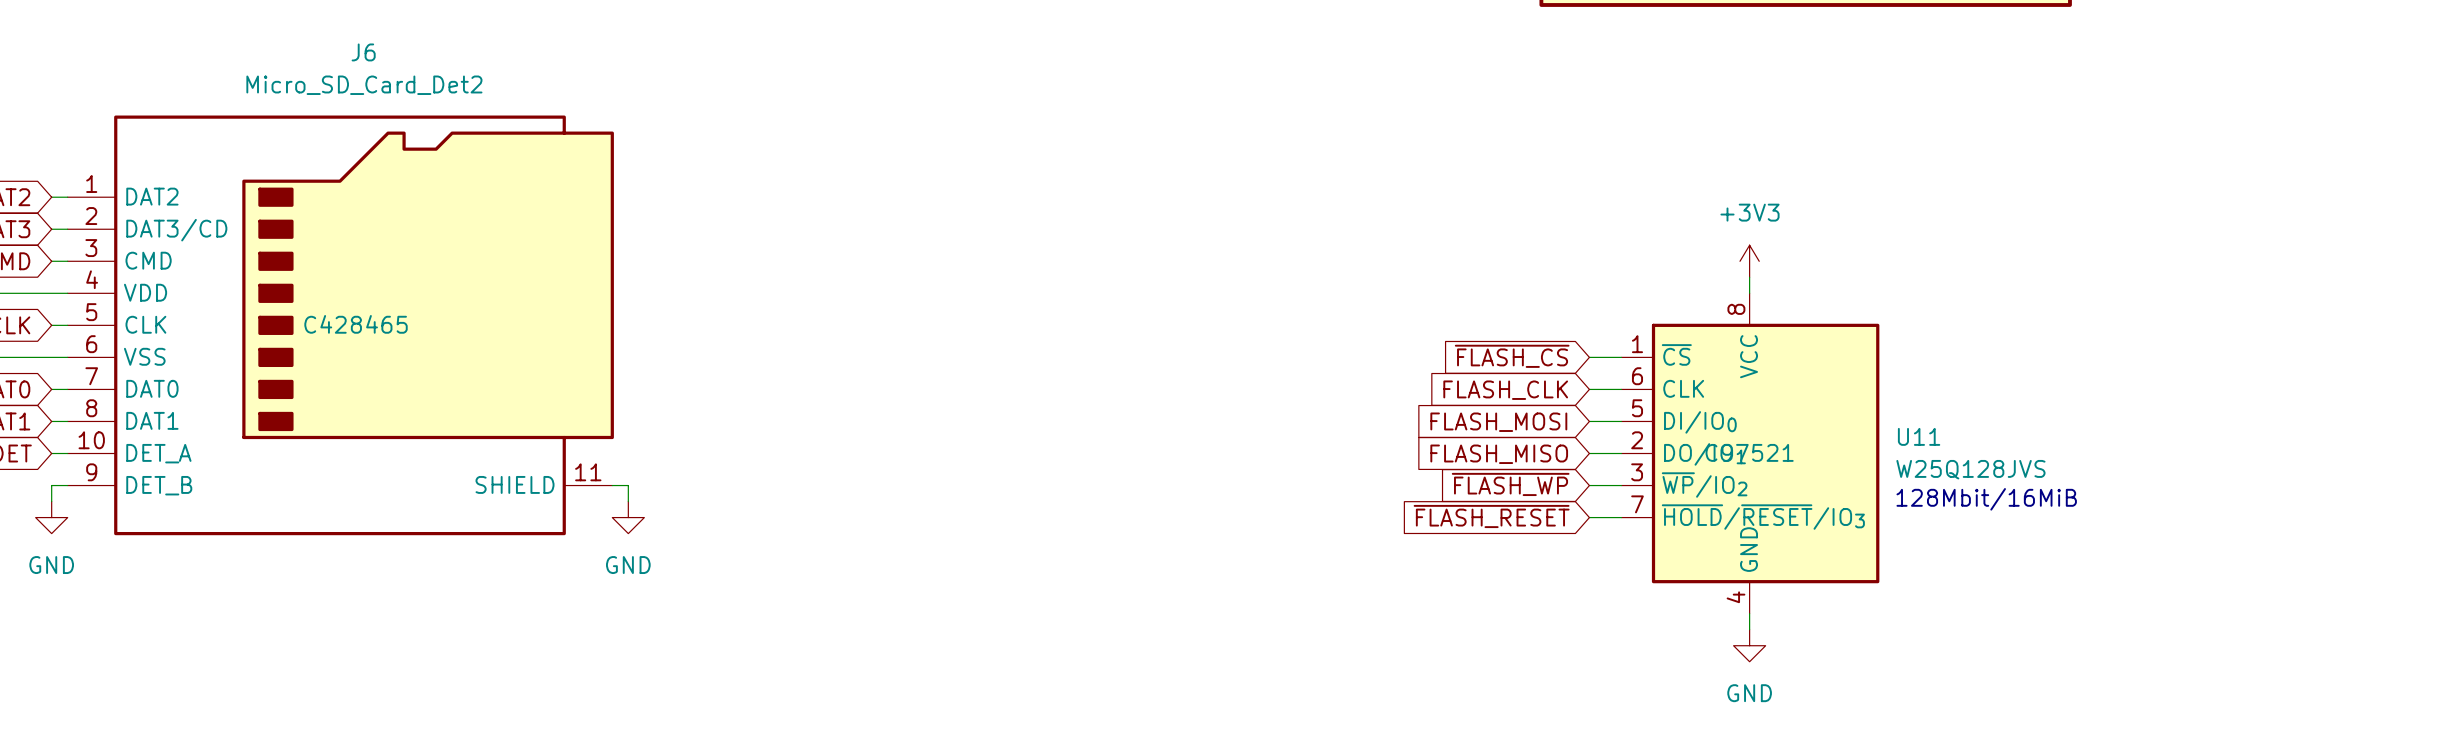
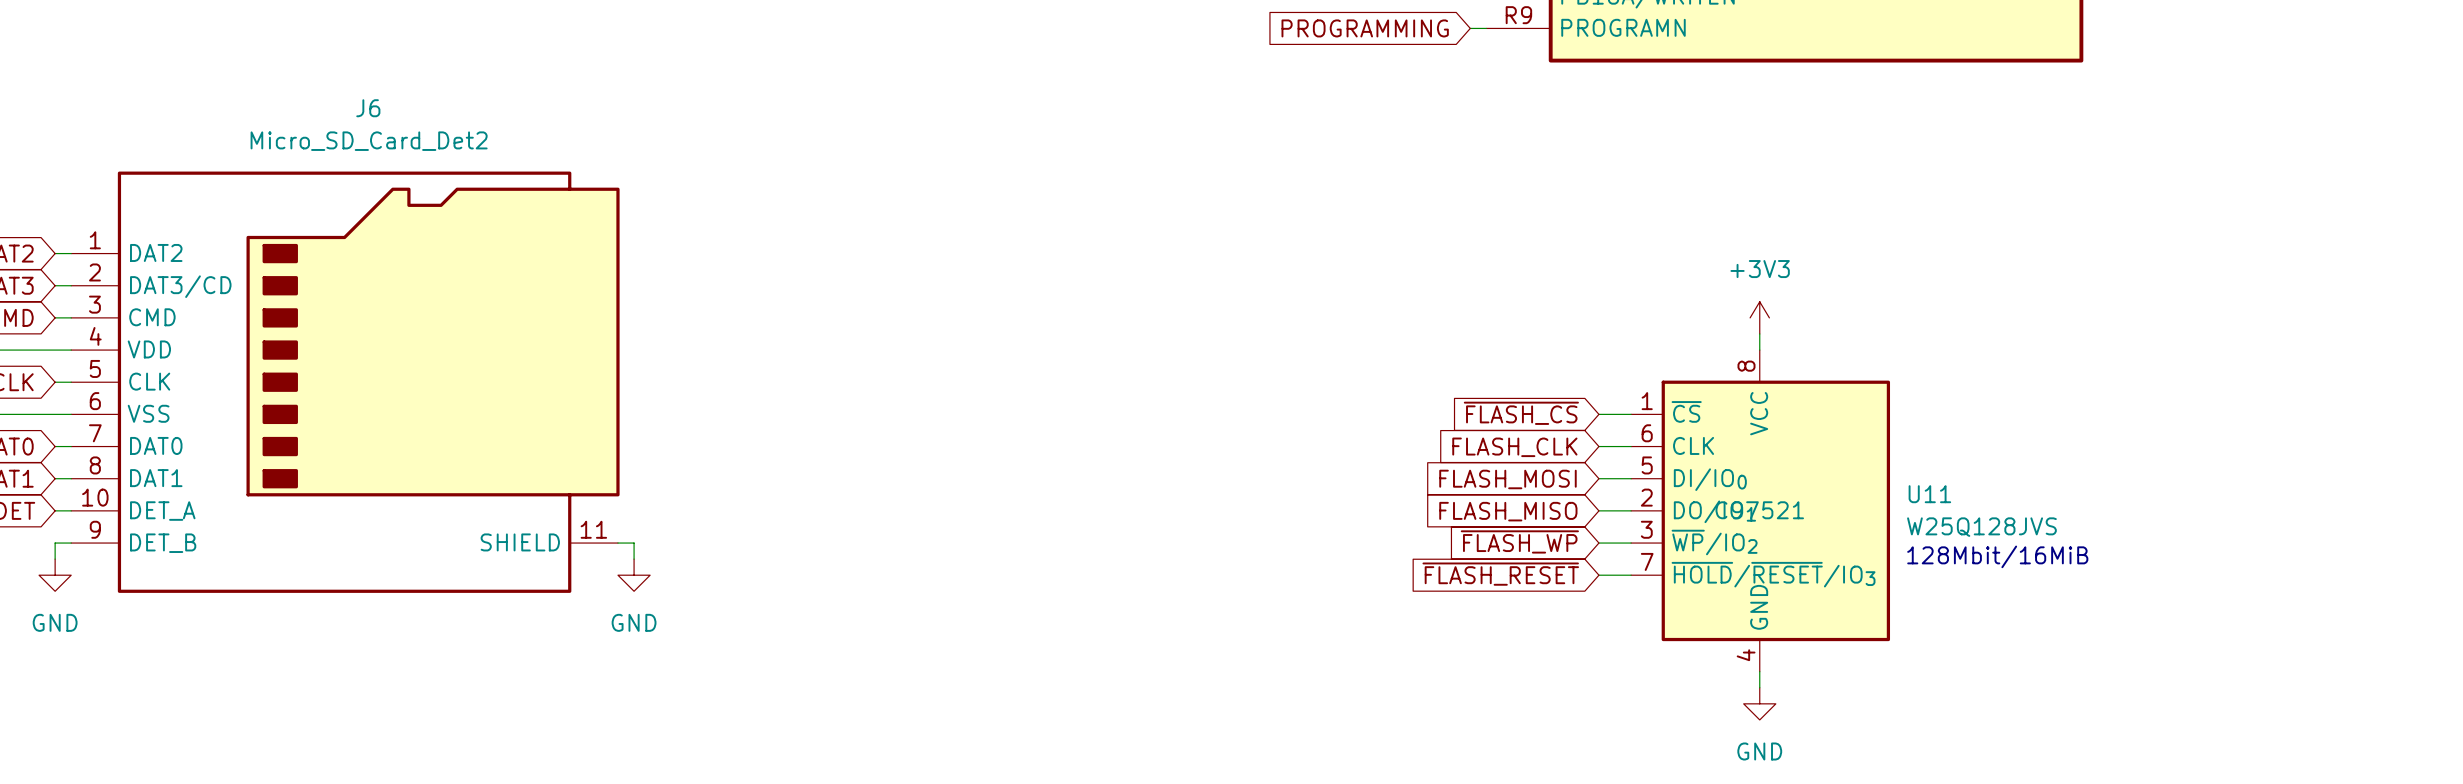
J6 text: C428465 (356, 324) -> none

